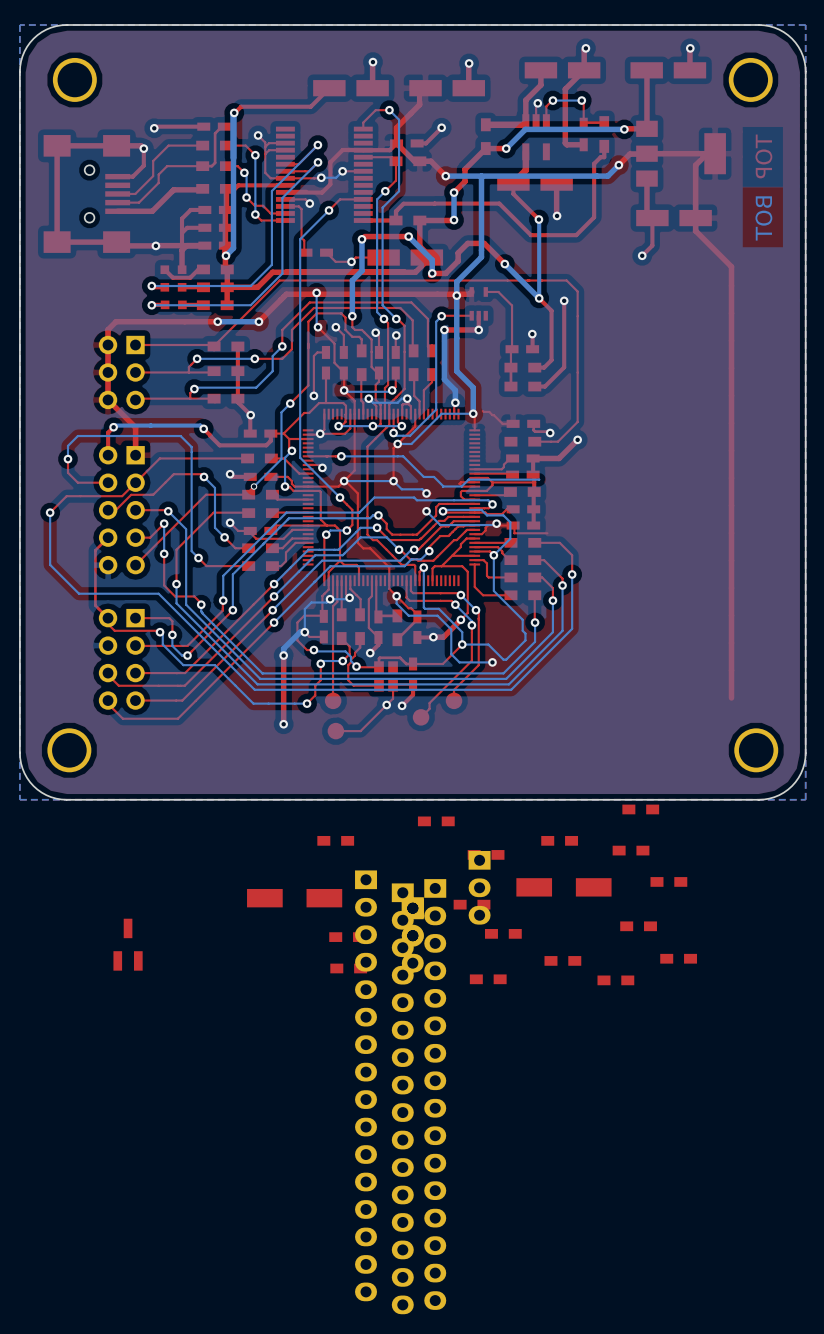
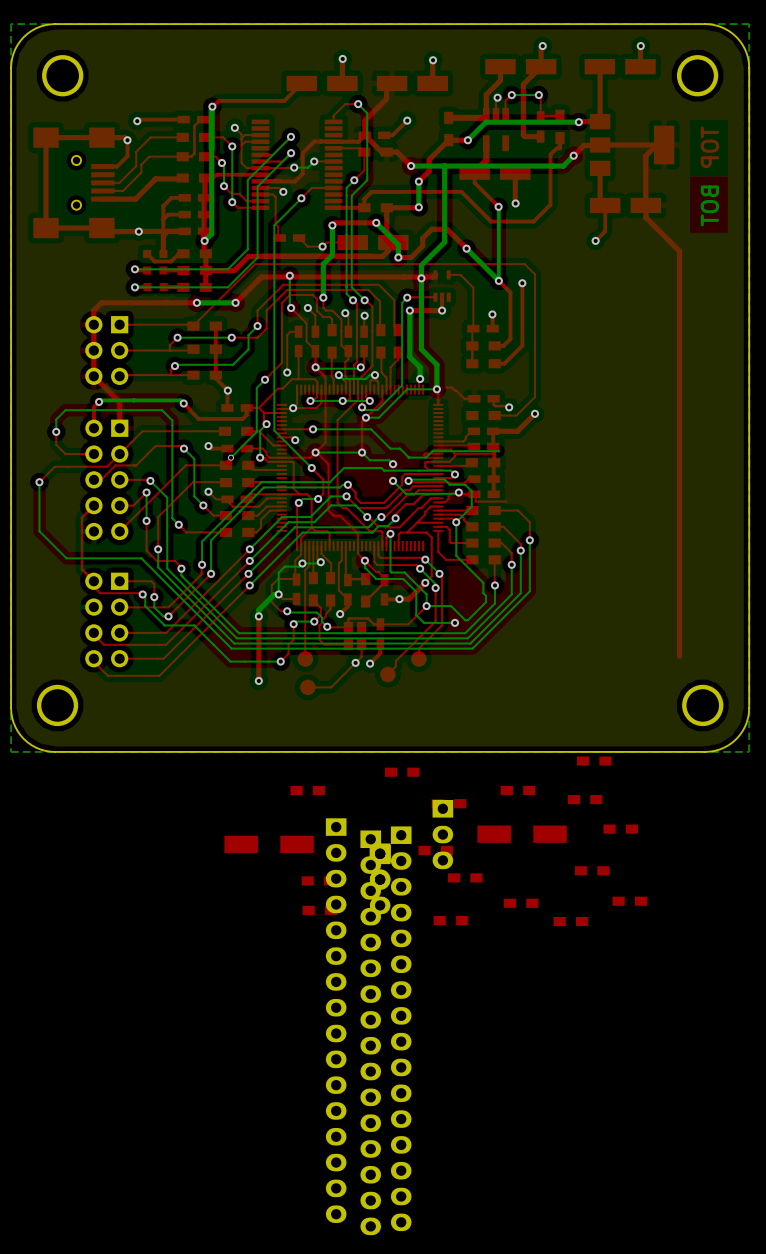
part: (128, 944) -> none

